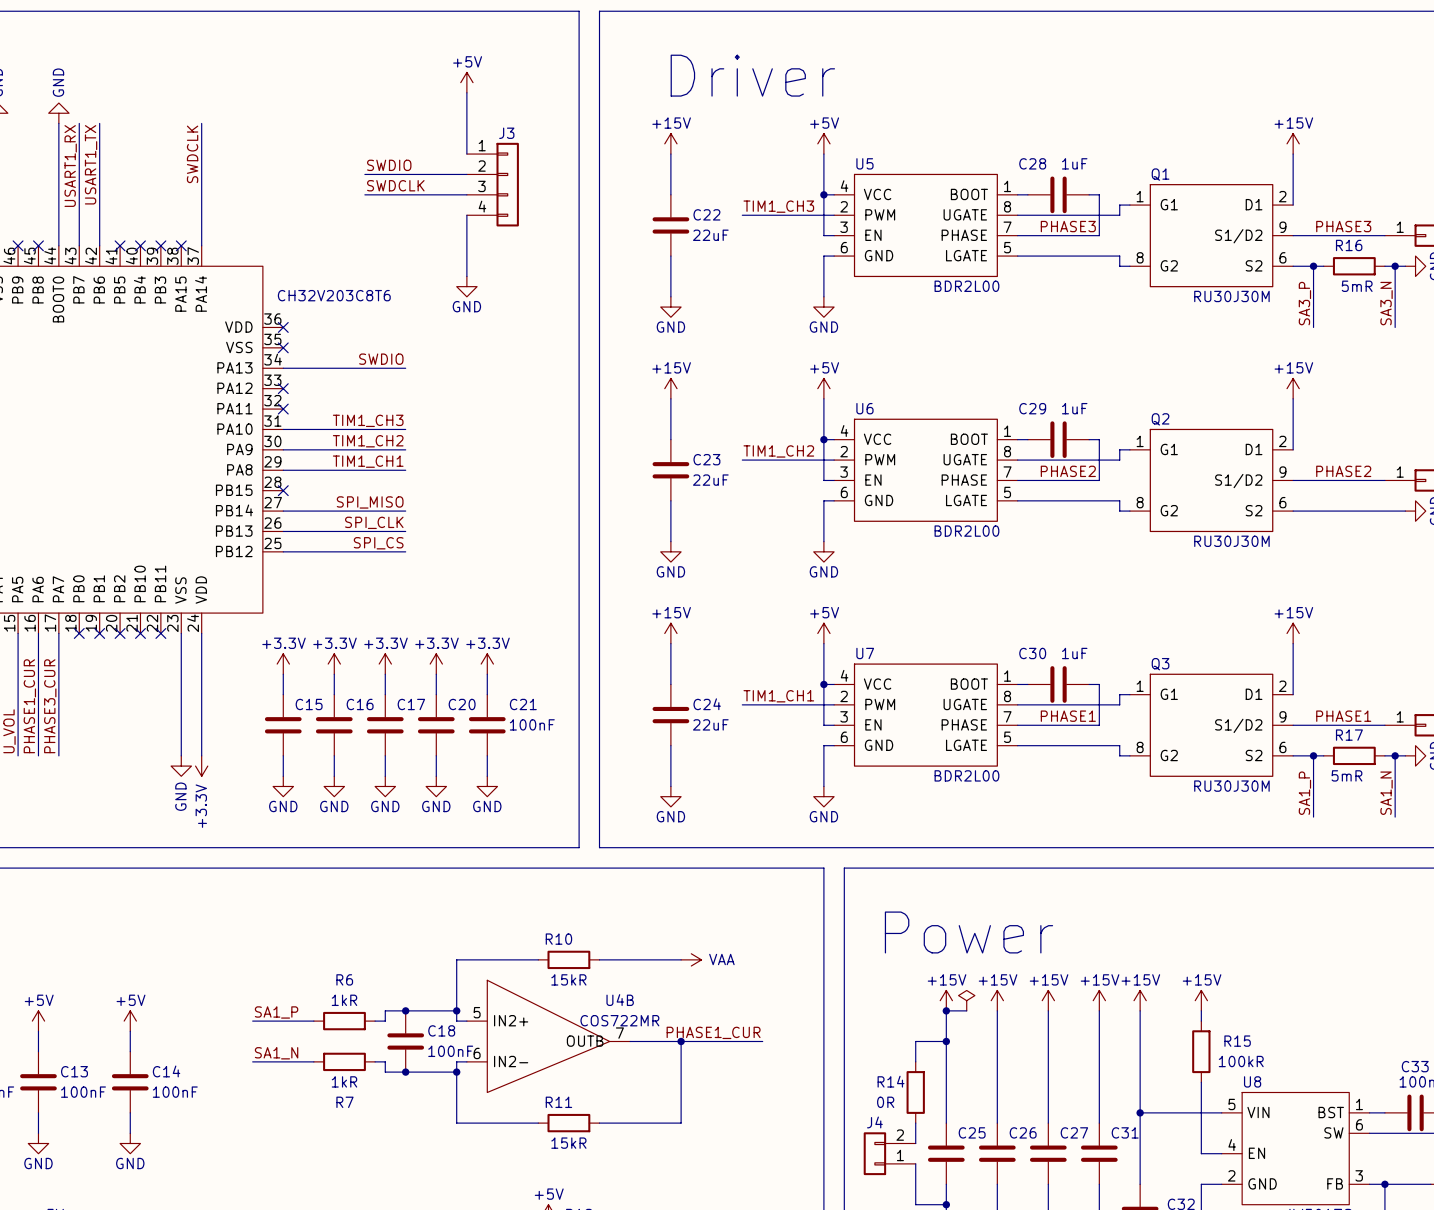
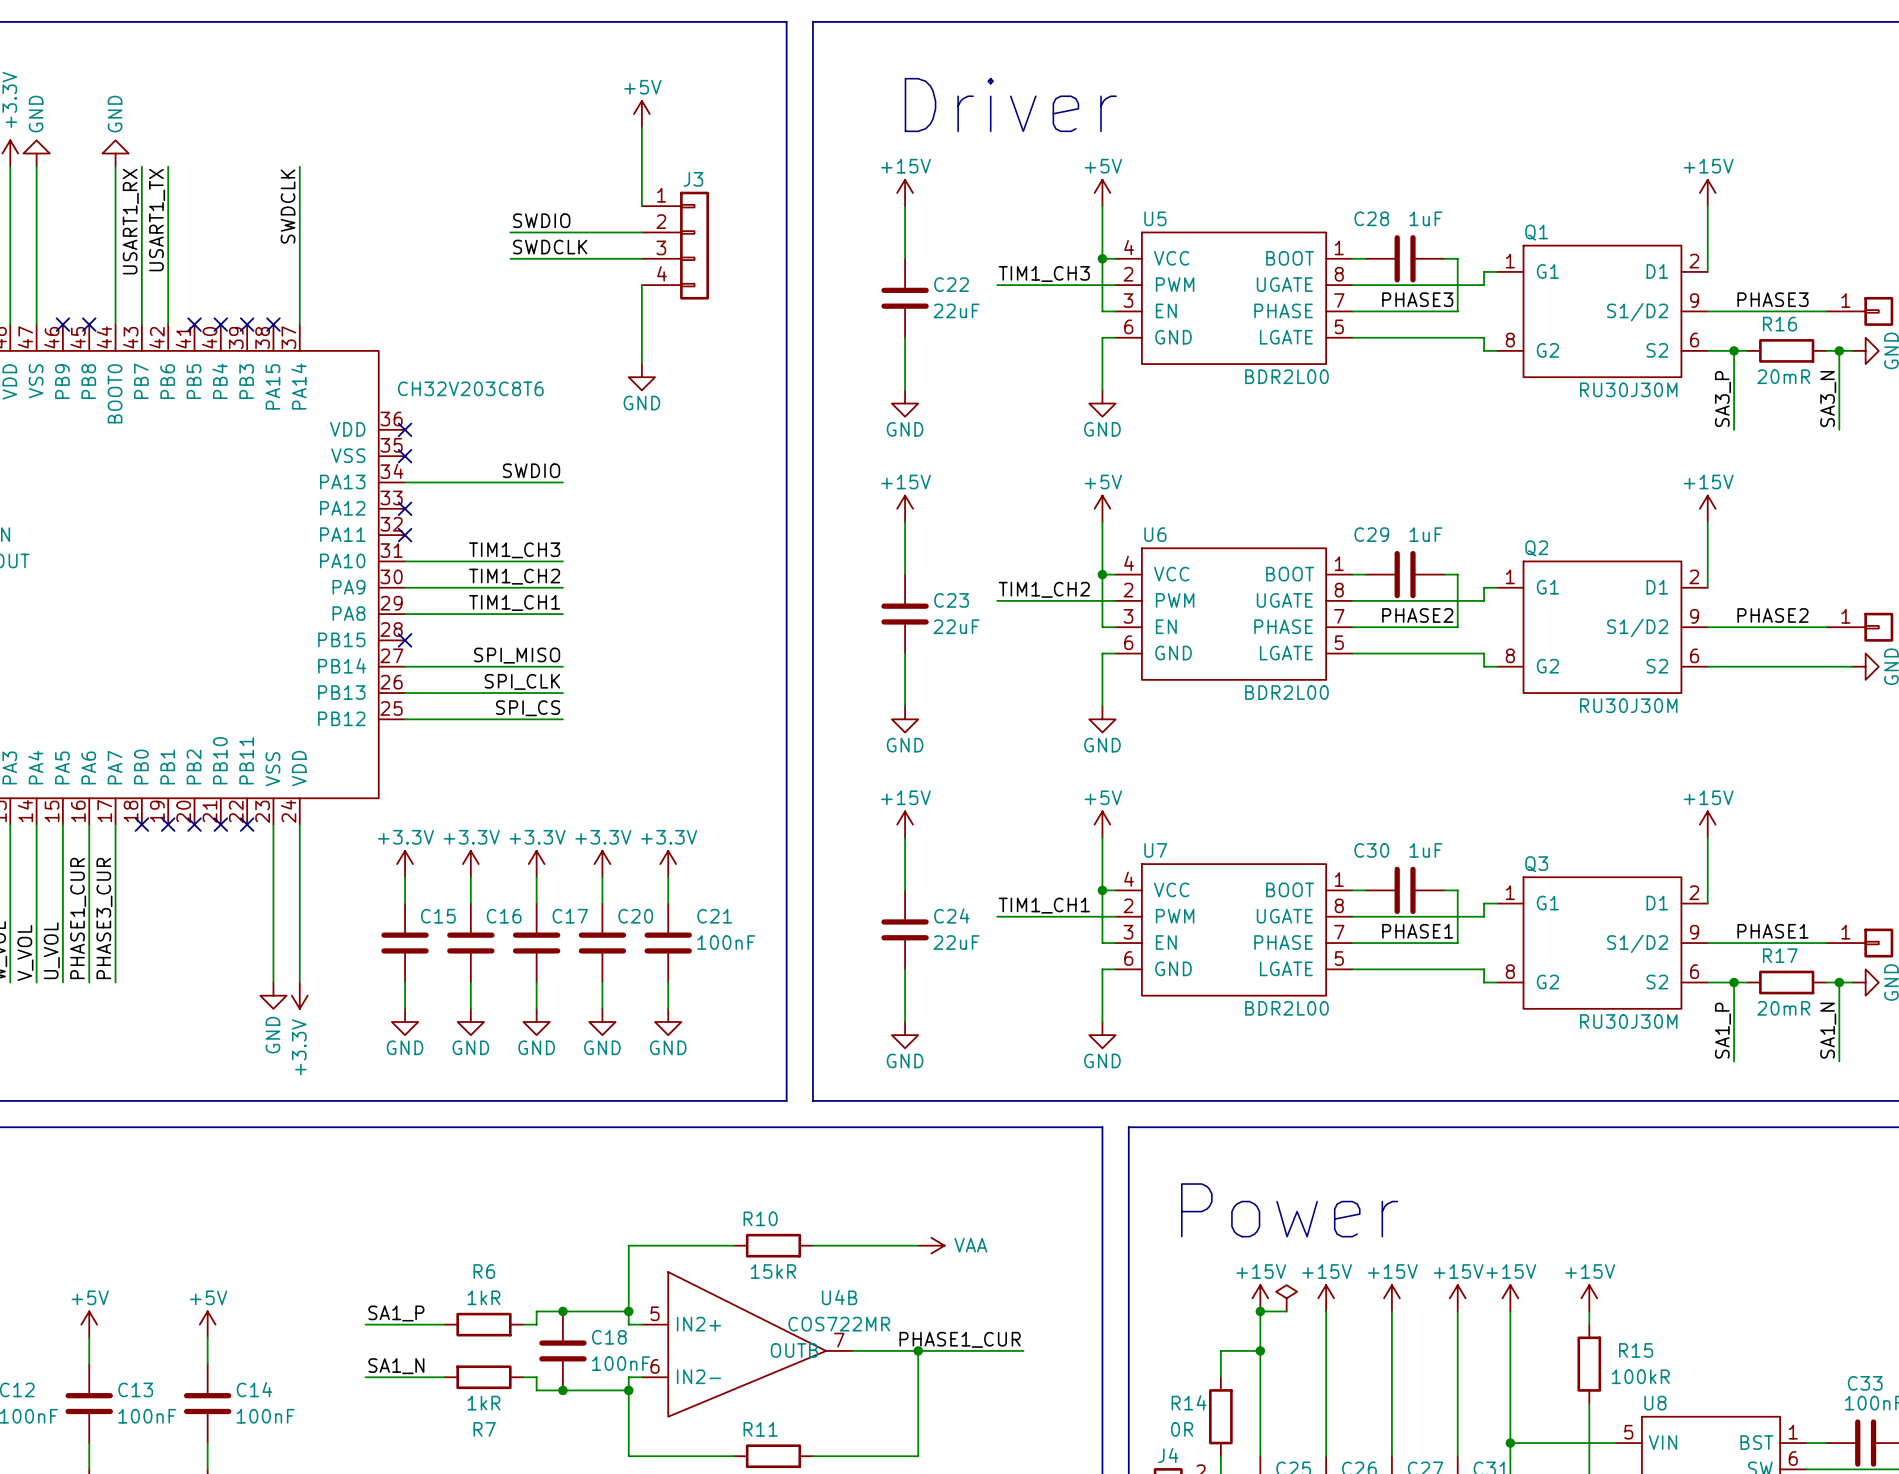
R16 value: 5mR (1357, 286) -> 20mR (1783, 376)
R17 value: 5mR (1346, 775) -> 20mR (1783, 1008)

